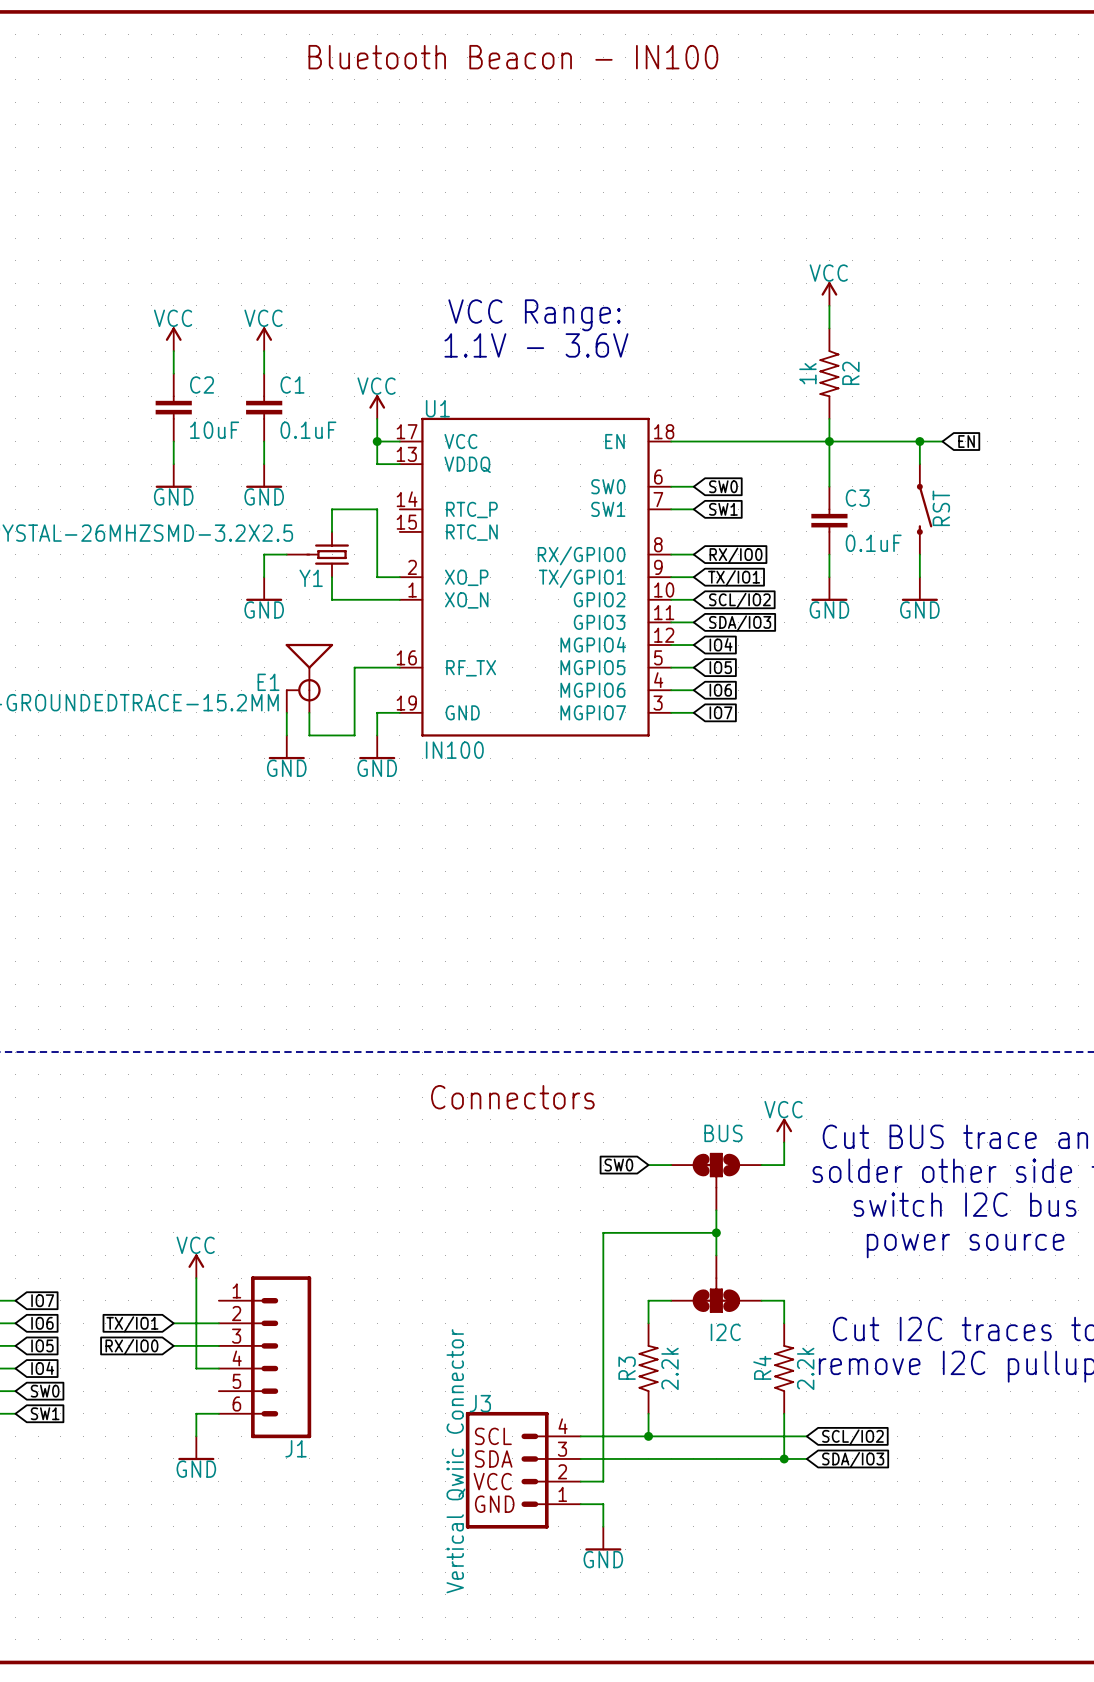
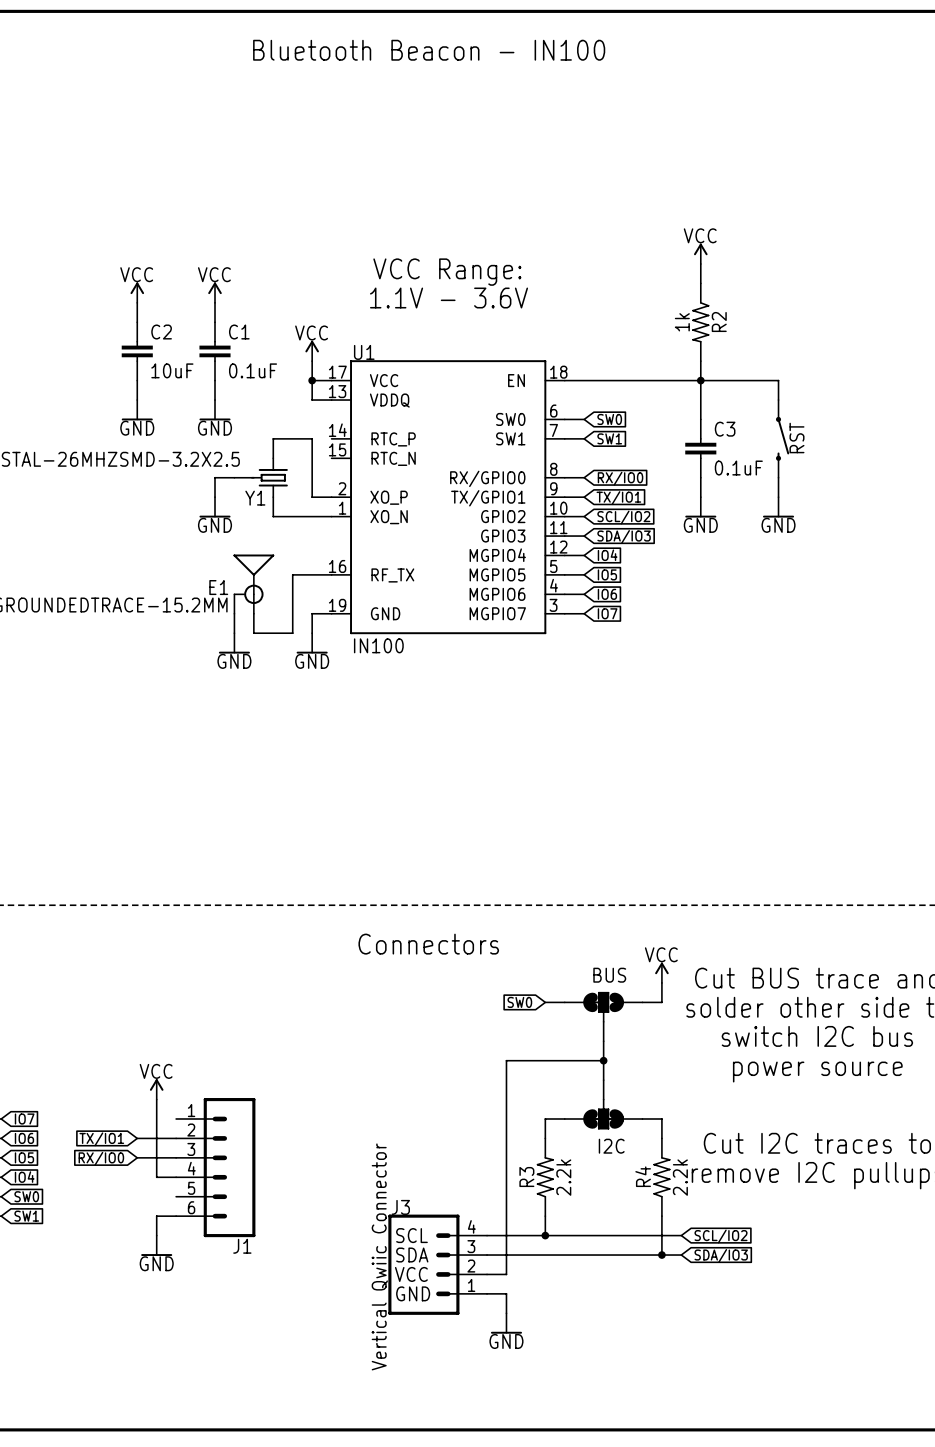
wire: (919, 441) (942, 441) -> none
junction: (919, 441) -> none
global label: EN (966, 441) -> none

